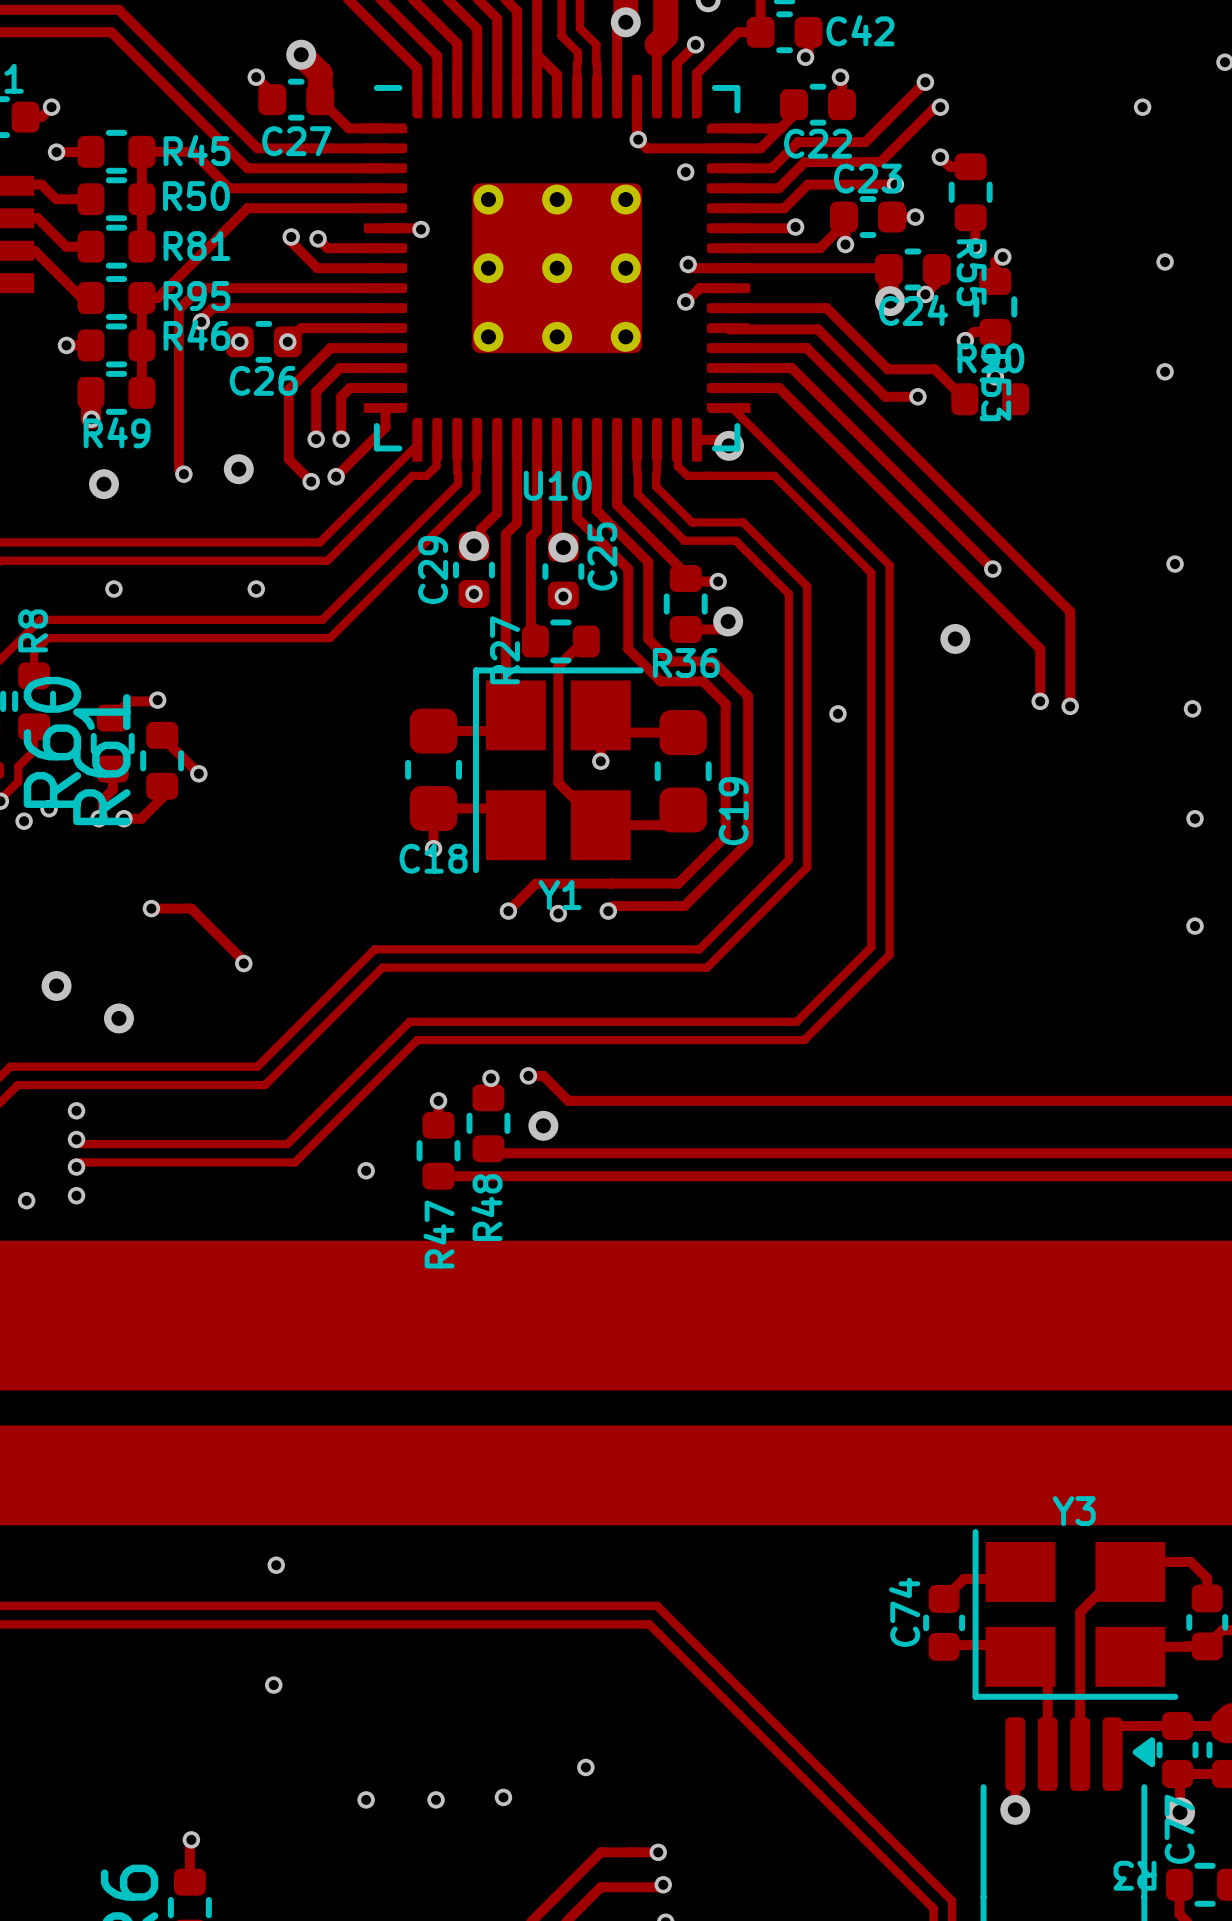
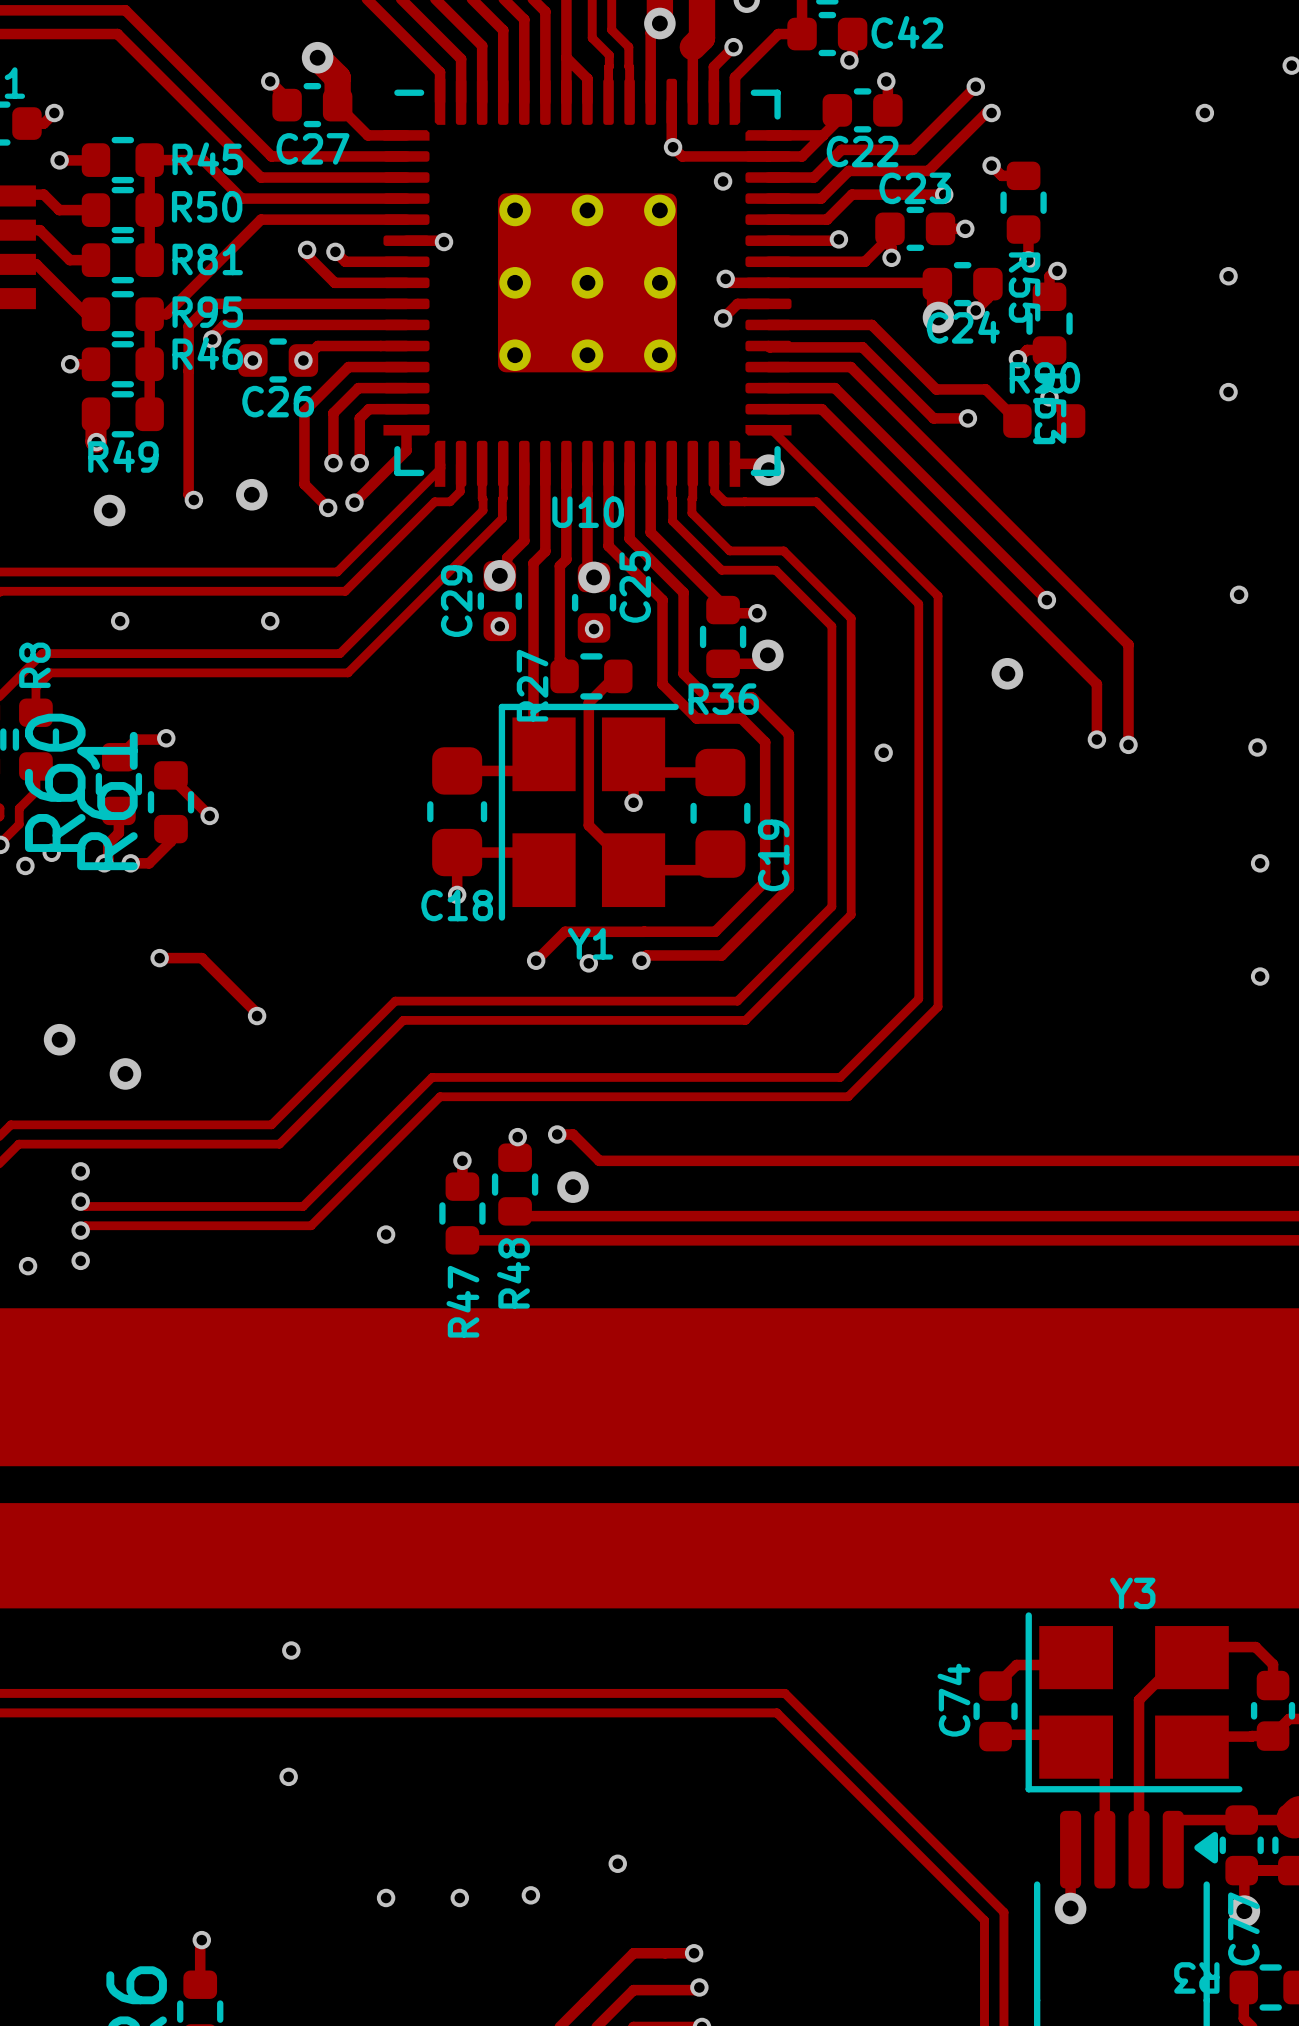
track: (657, 1605) (952, 1900) -> (692, 1693) (785, 1693) (1003, 1912) (1003, 2004)
track: (649, 1624) (933, 1908) -> (684, 1712) (776, 1712) (984, 1920) (984, 2012)

